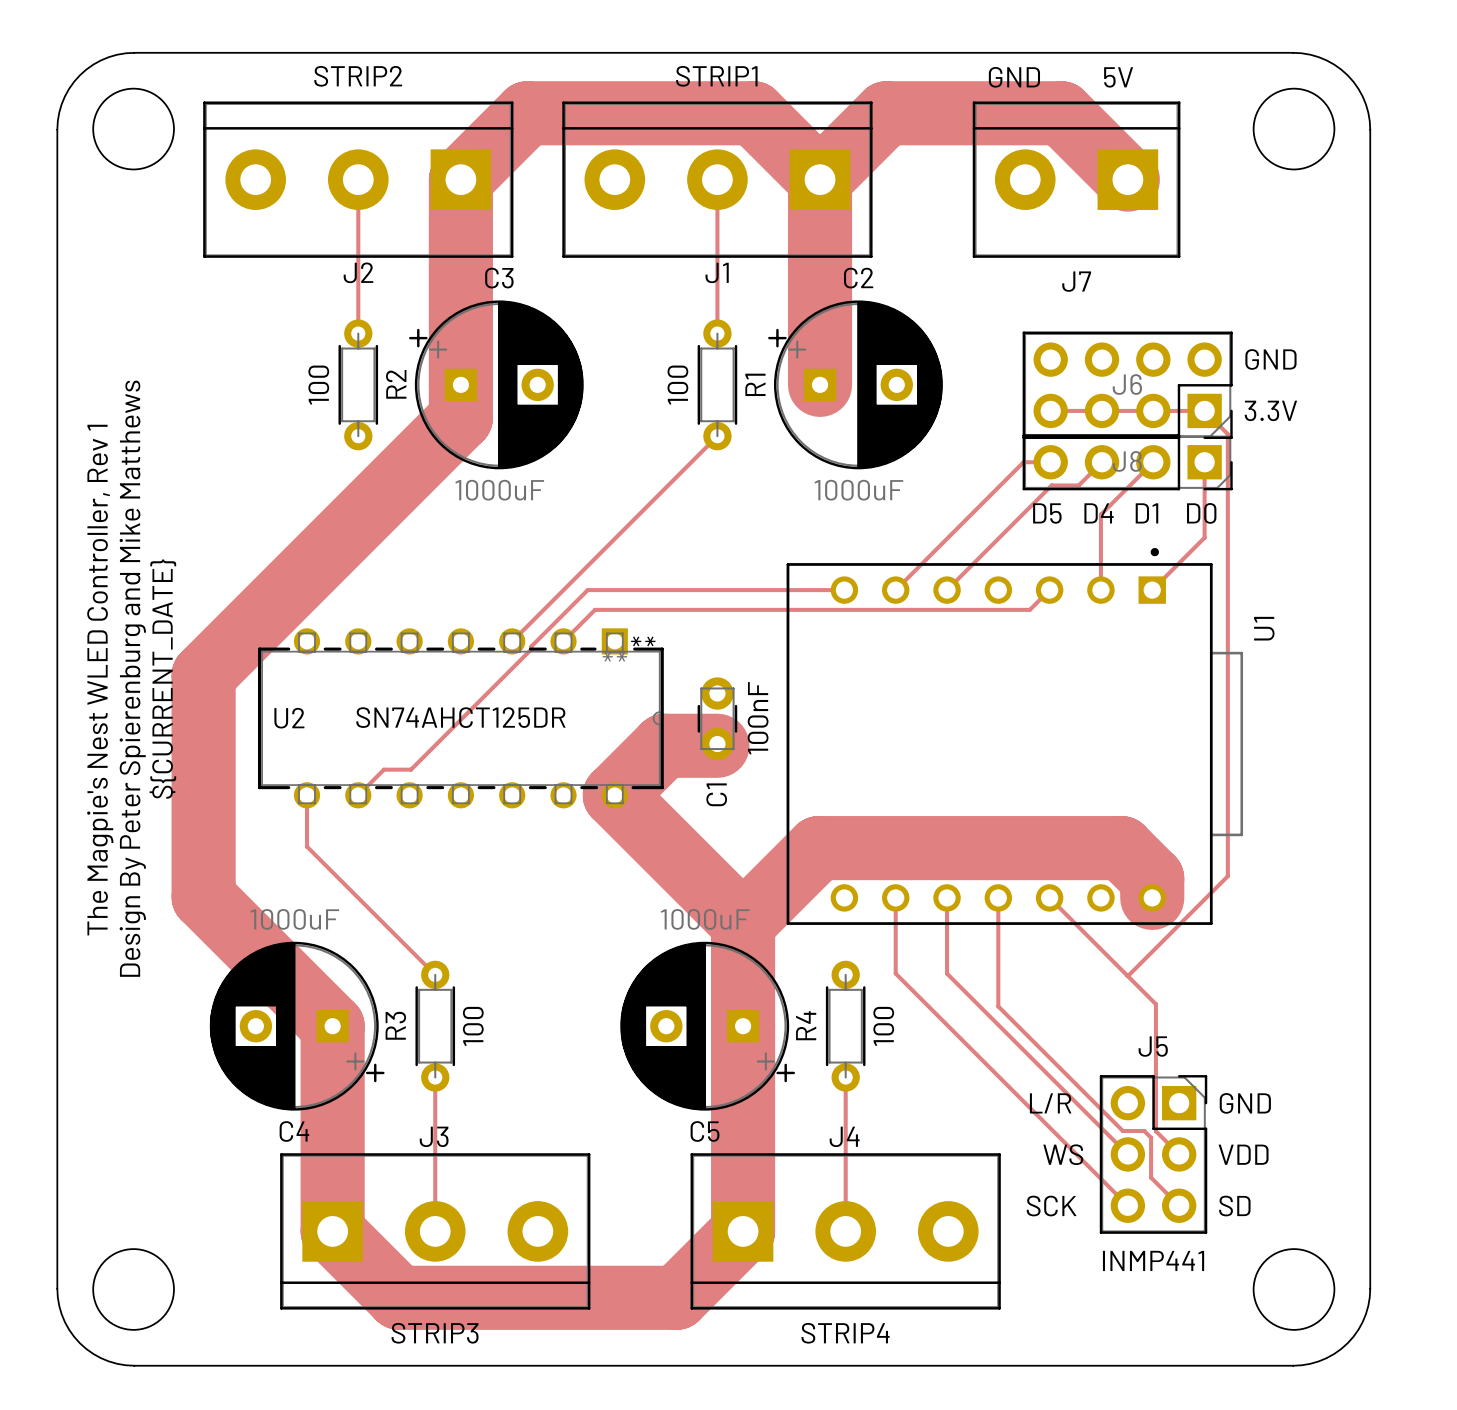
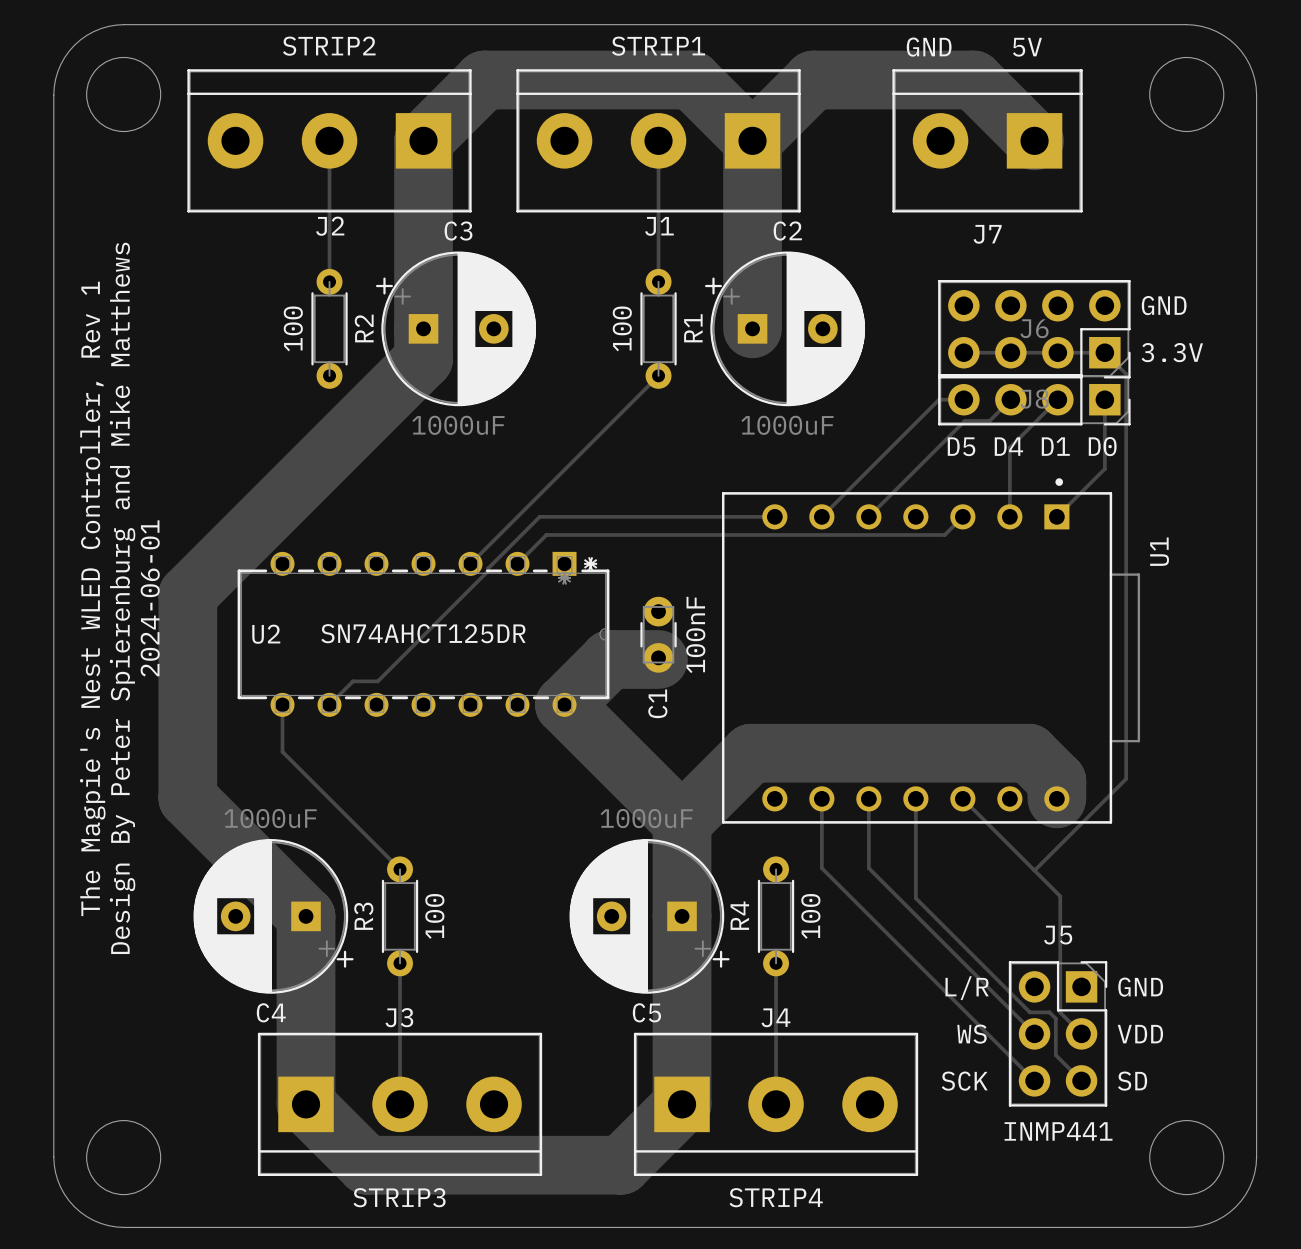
text: ${CURRENT_DATE} (162, 679) -> 2024-06-01 (150, 598)

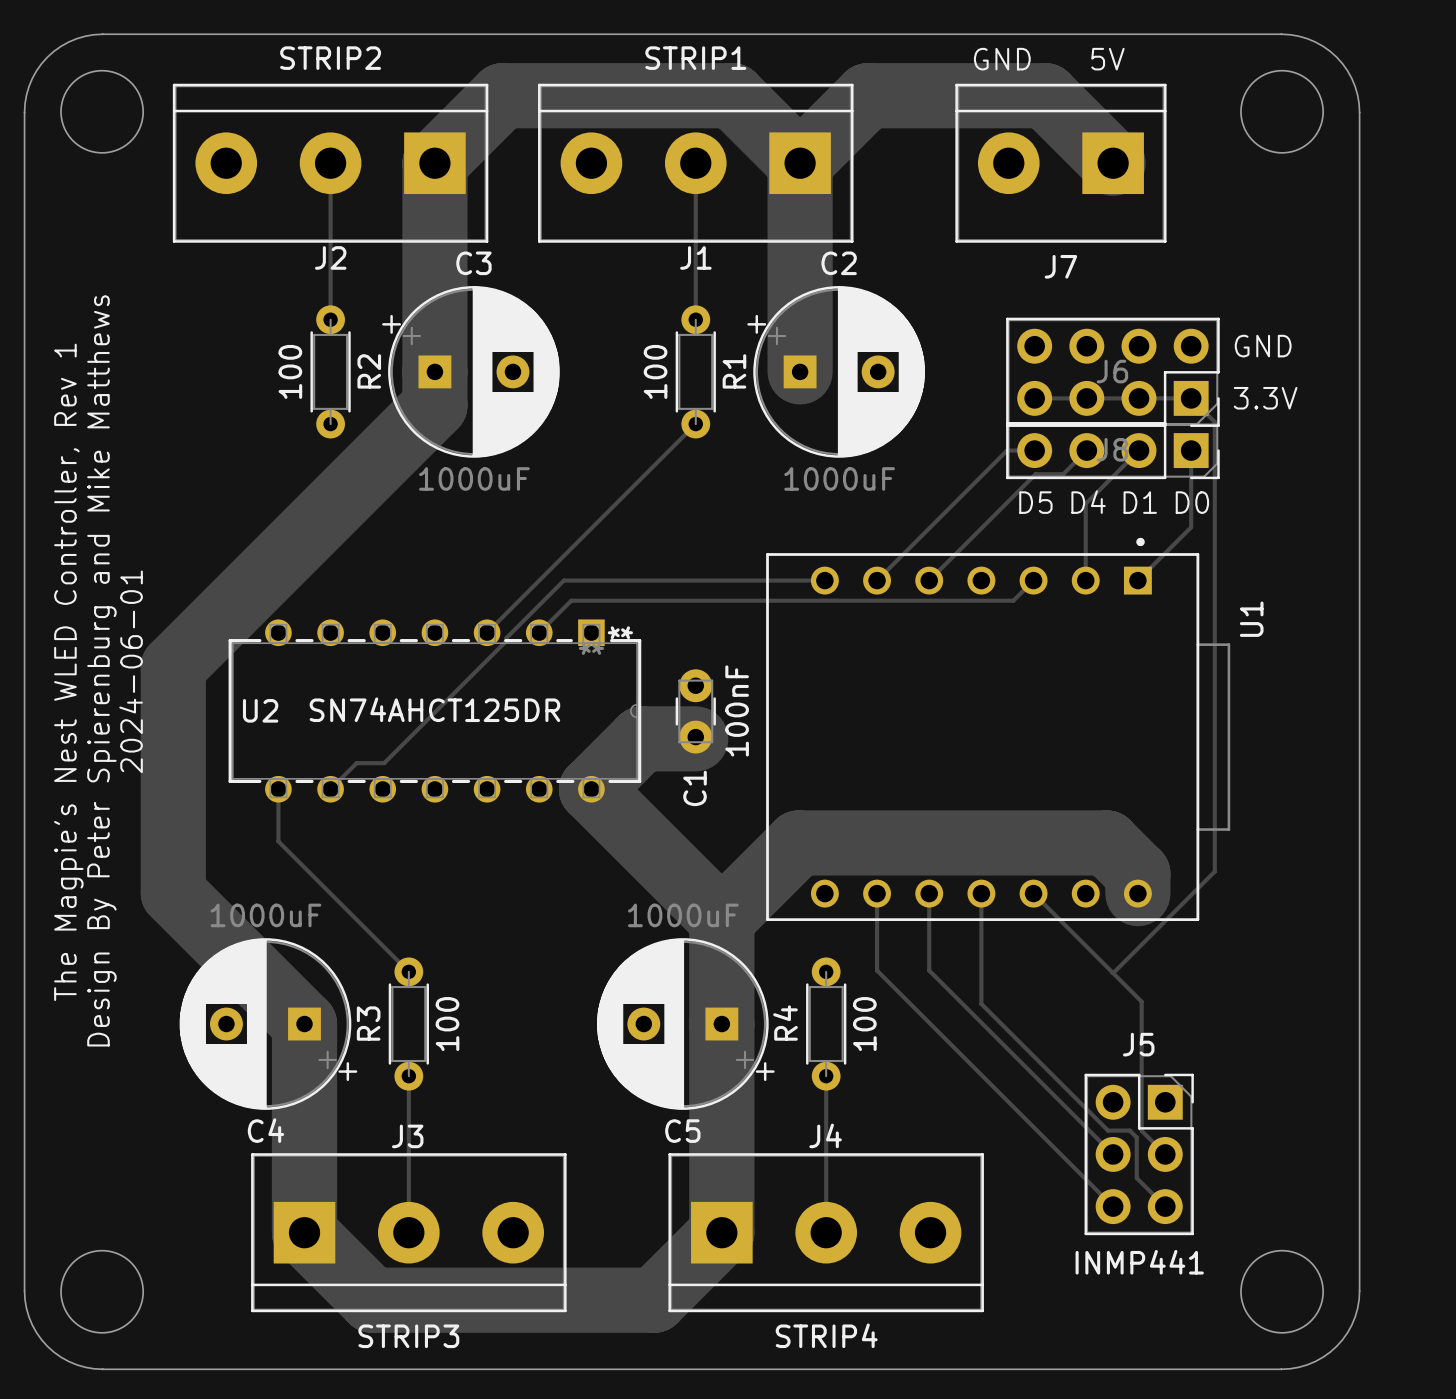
text: GND (1140, 987) -> none
text: L/R (967, 988) -> none
text: WS (972, 1034) -> none
text: VDD (1140, 1034) -> none
text: SCK (964, 1081) -> none
text: SD (1132, 1081) -> none

